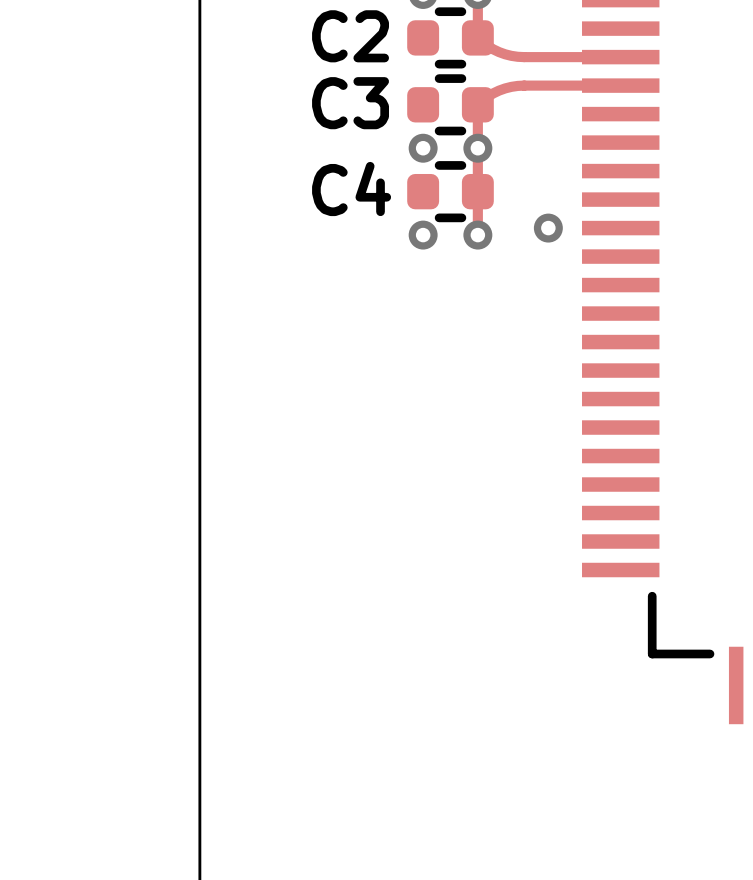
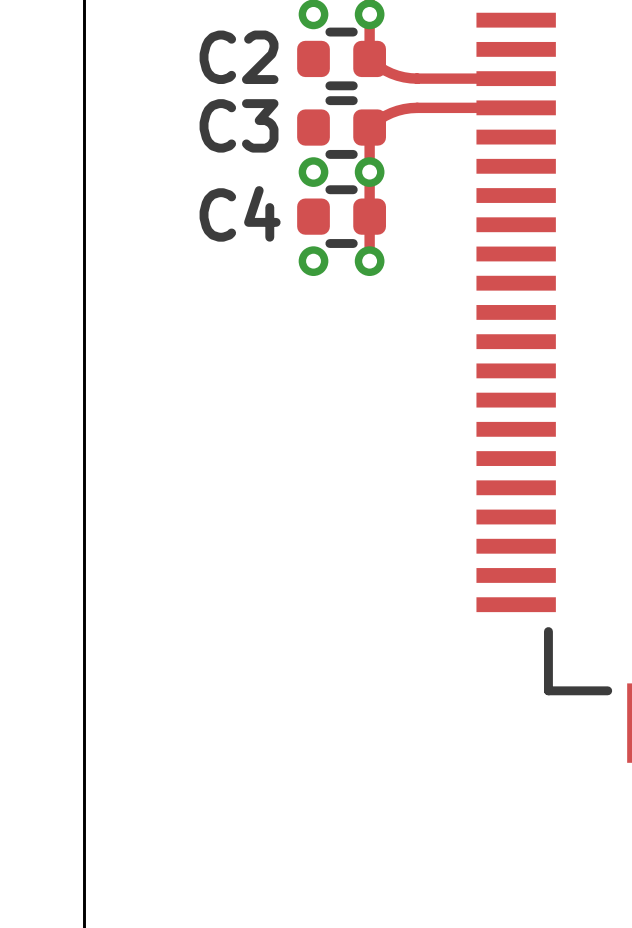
via: (548, 228) -> none

